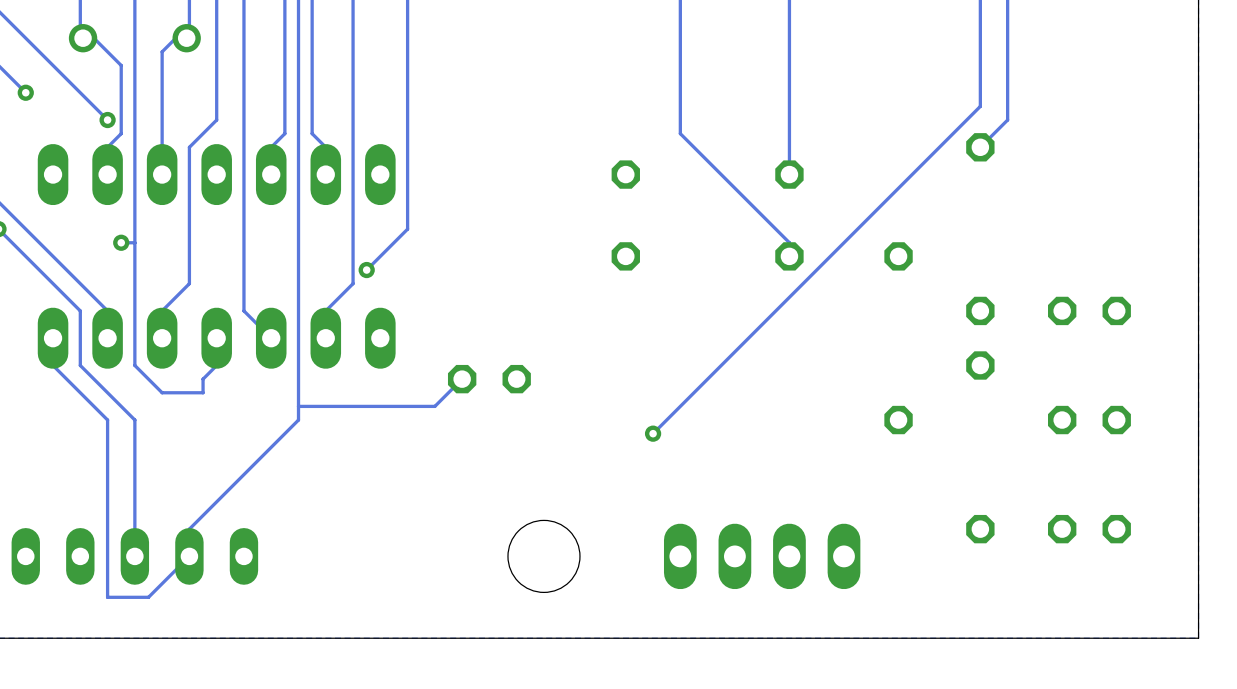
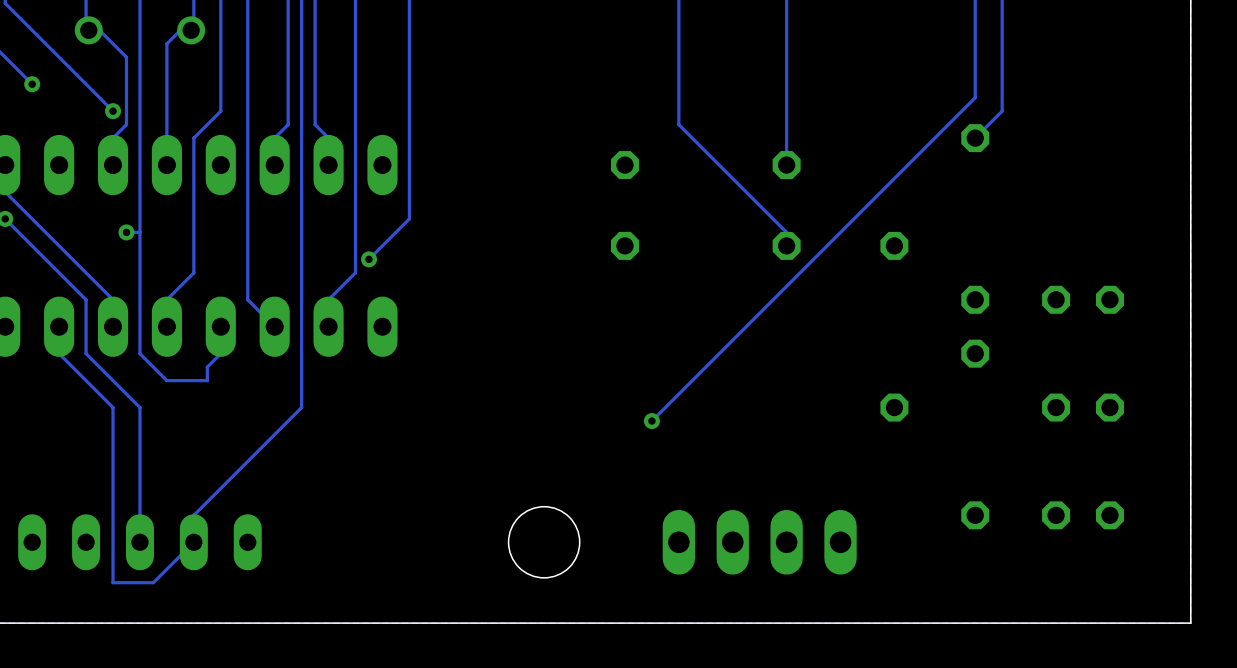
track: (462, 379) (434, 406) (298, 406) -> none
part: (489, 379) -> none

